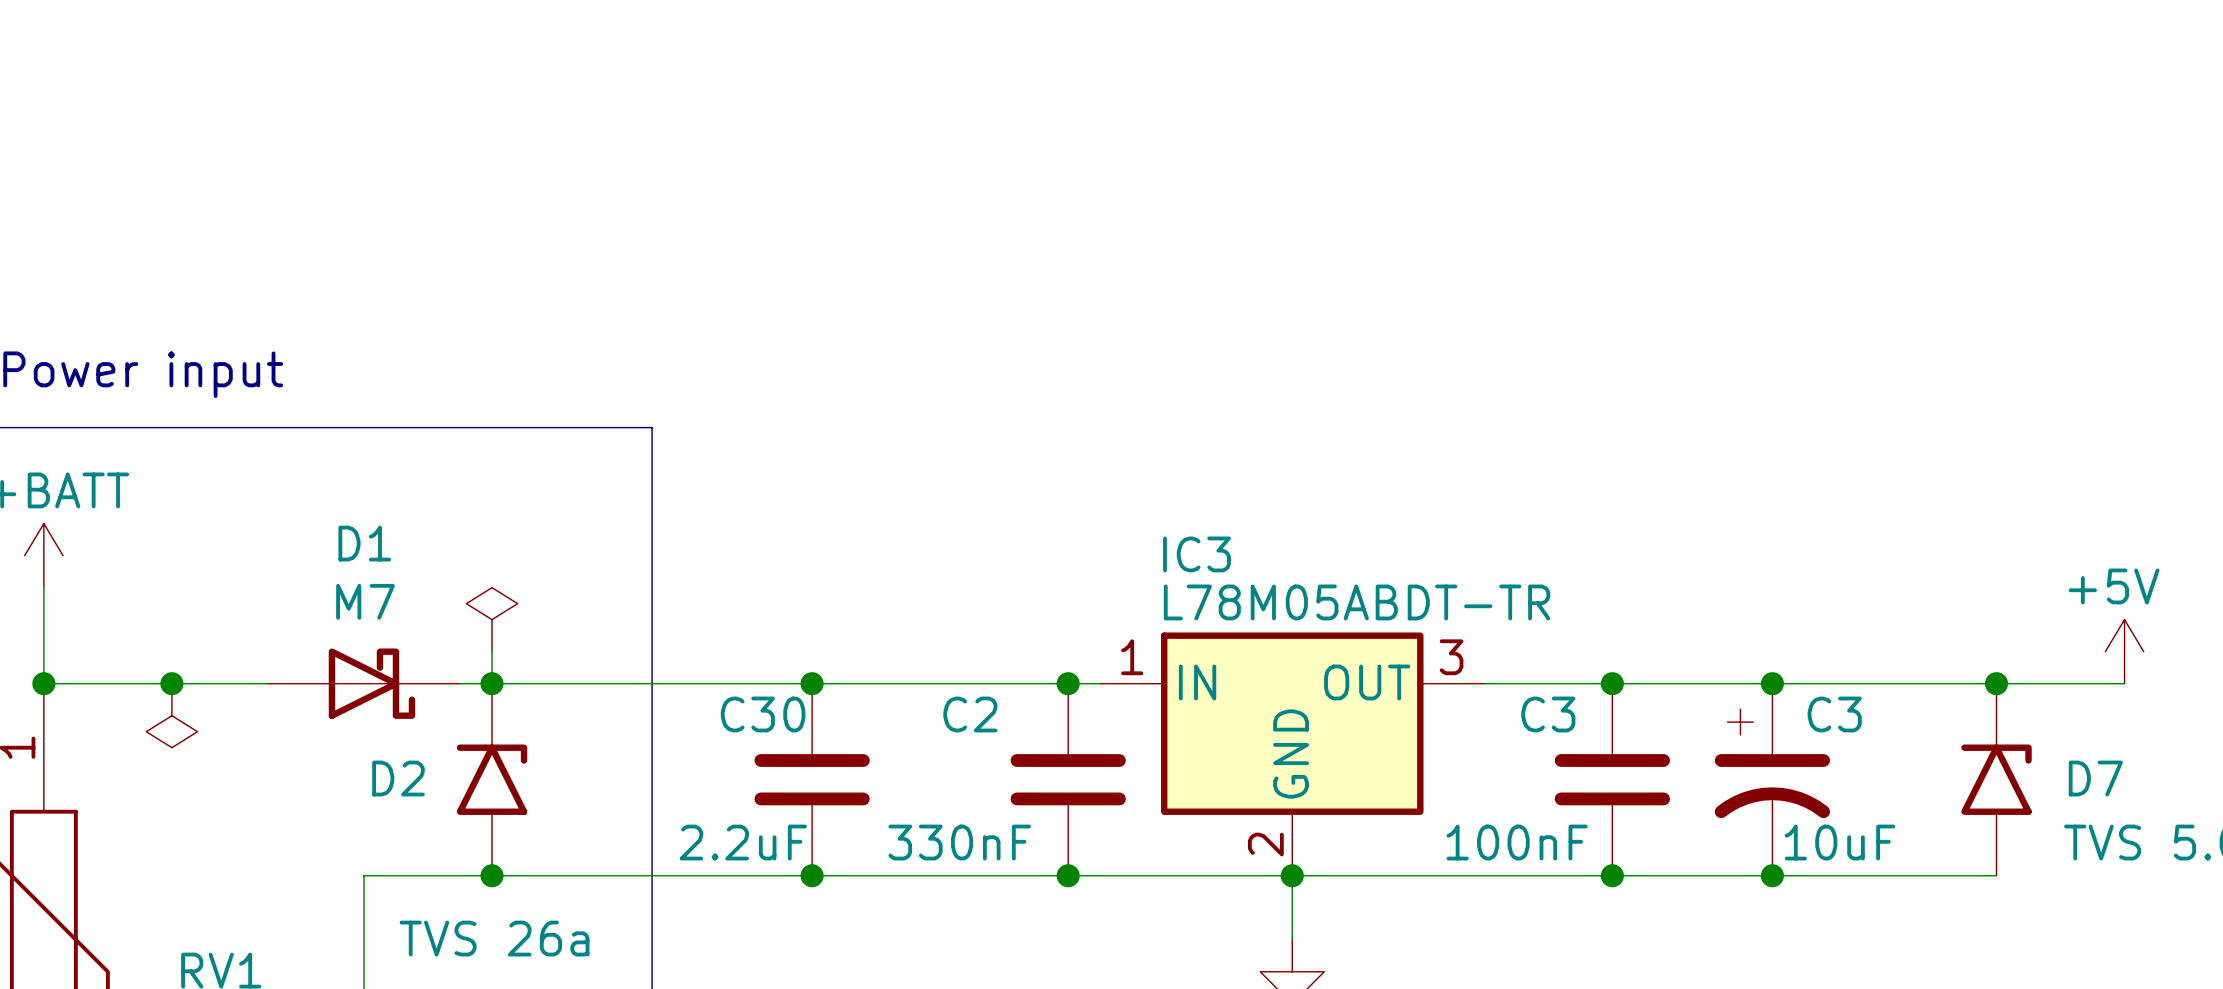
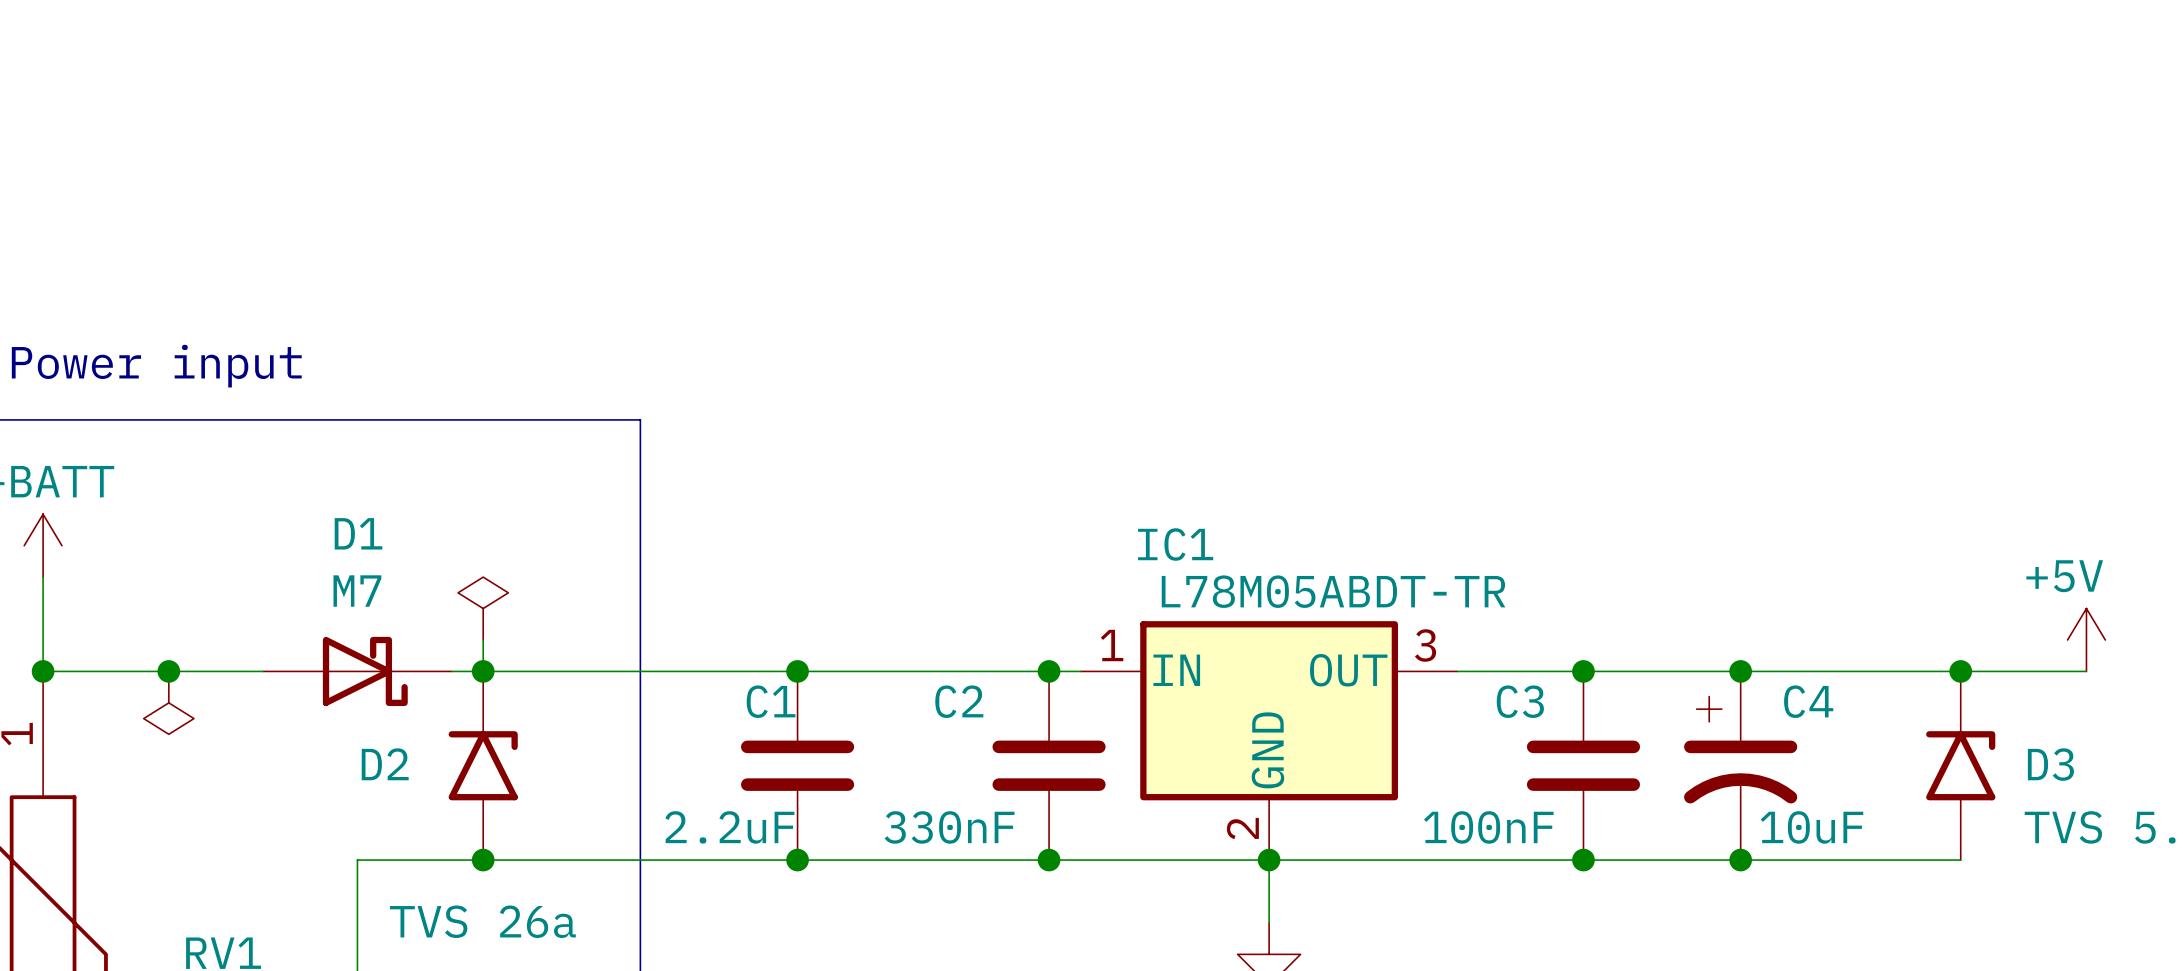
IC3 name: IC3 (1197, 554) -> IC1 (1175, 544)
C30 name: C30 (763, 714) -> C1 (771, 701)
C3 name: C3 (1834, 714) -> C4 (1808, 701)
D7 name: D7 (2095, 778) -> D3 (2050, 764)

